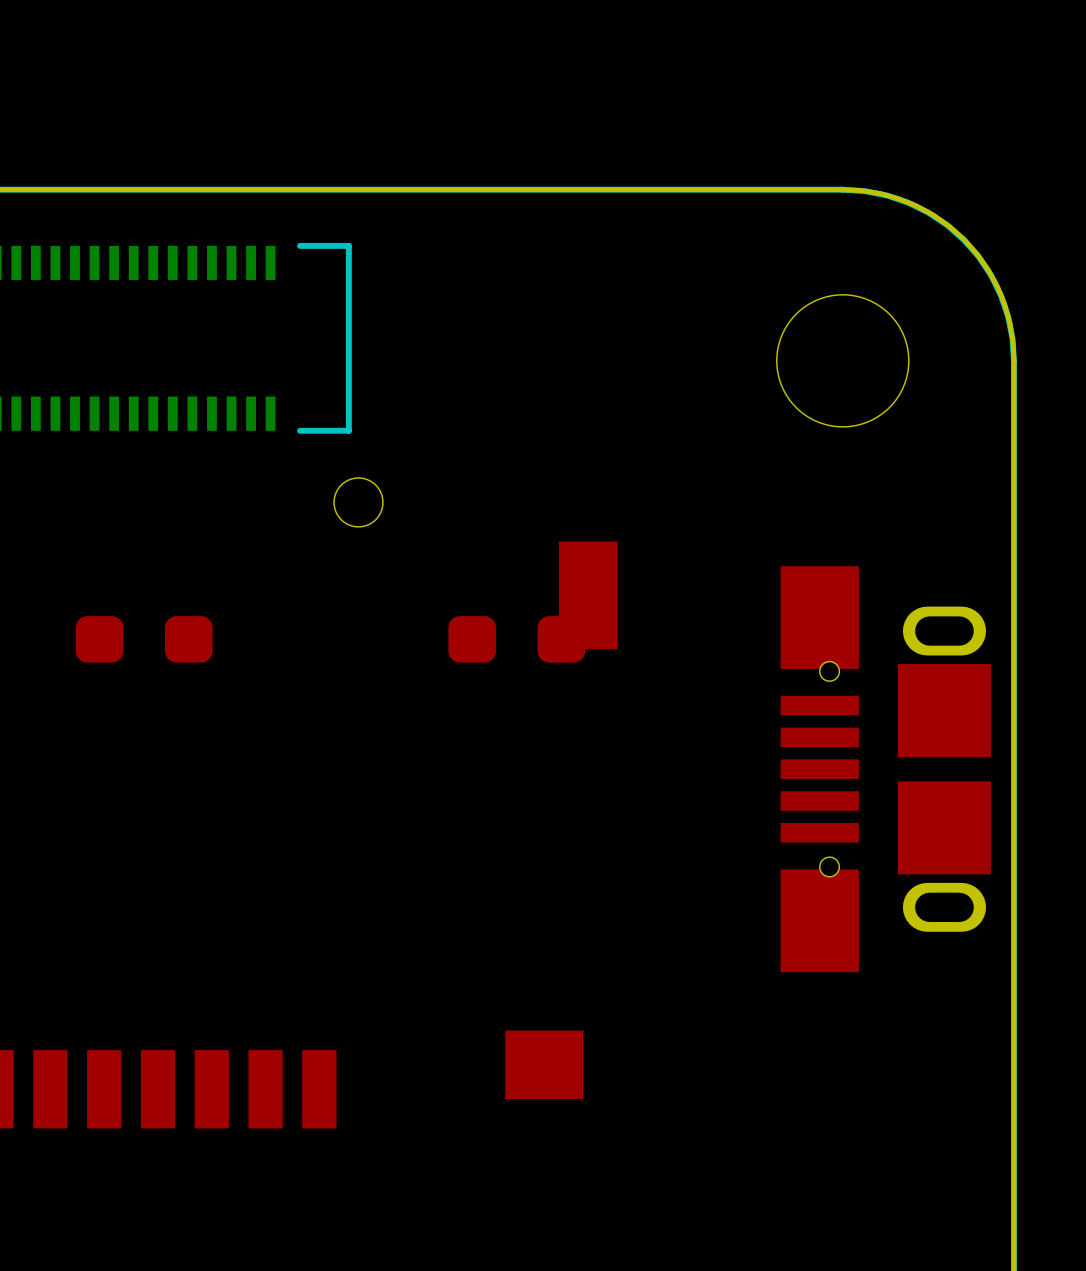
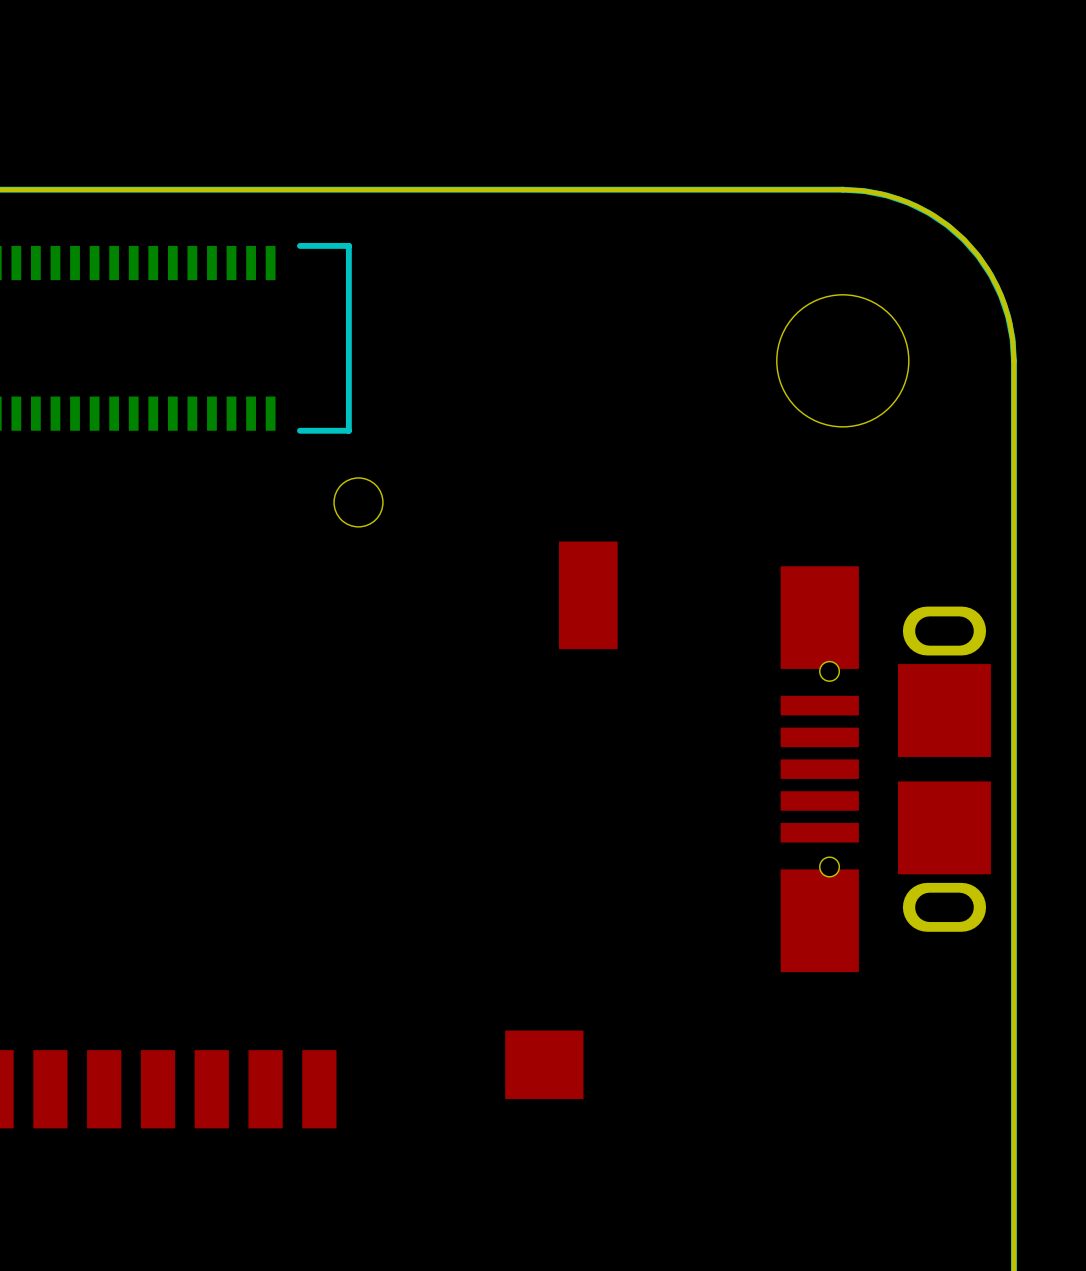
part: (144, 639) -> none
part: (516, 639) -> none

